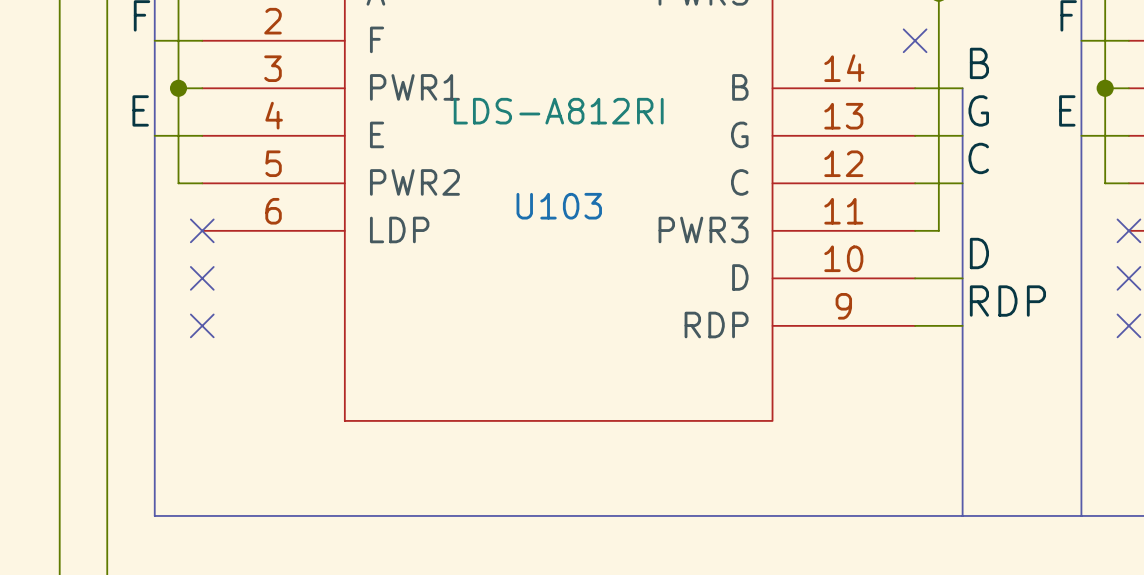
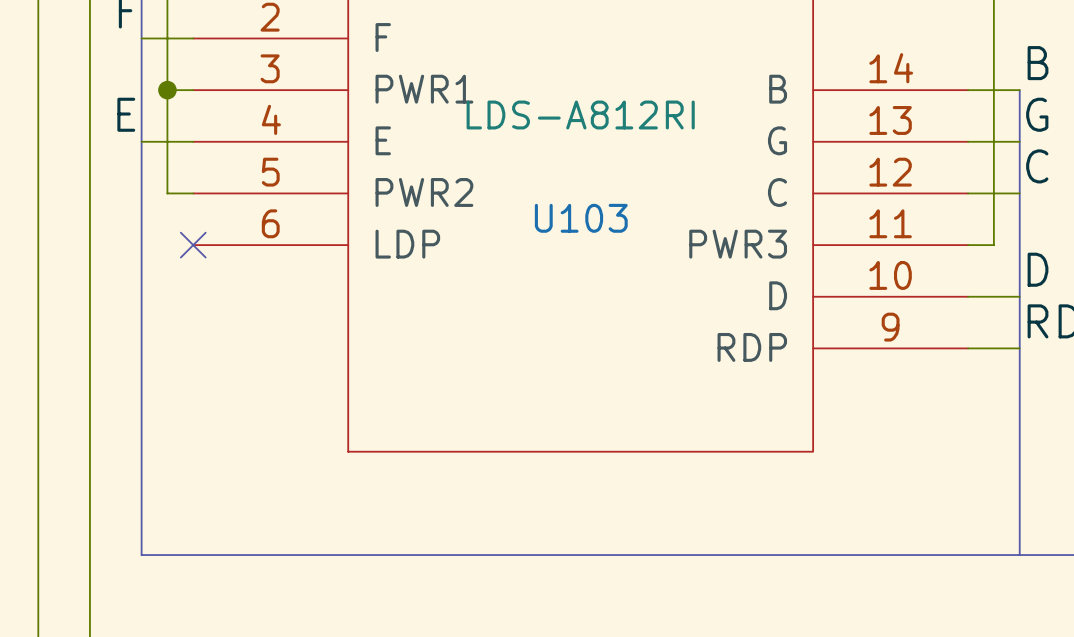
no-connect mark: (915, 40) -> none
no-connect mark: (202, 278) -> none
no-connect mark: (202, 325) -> none

